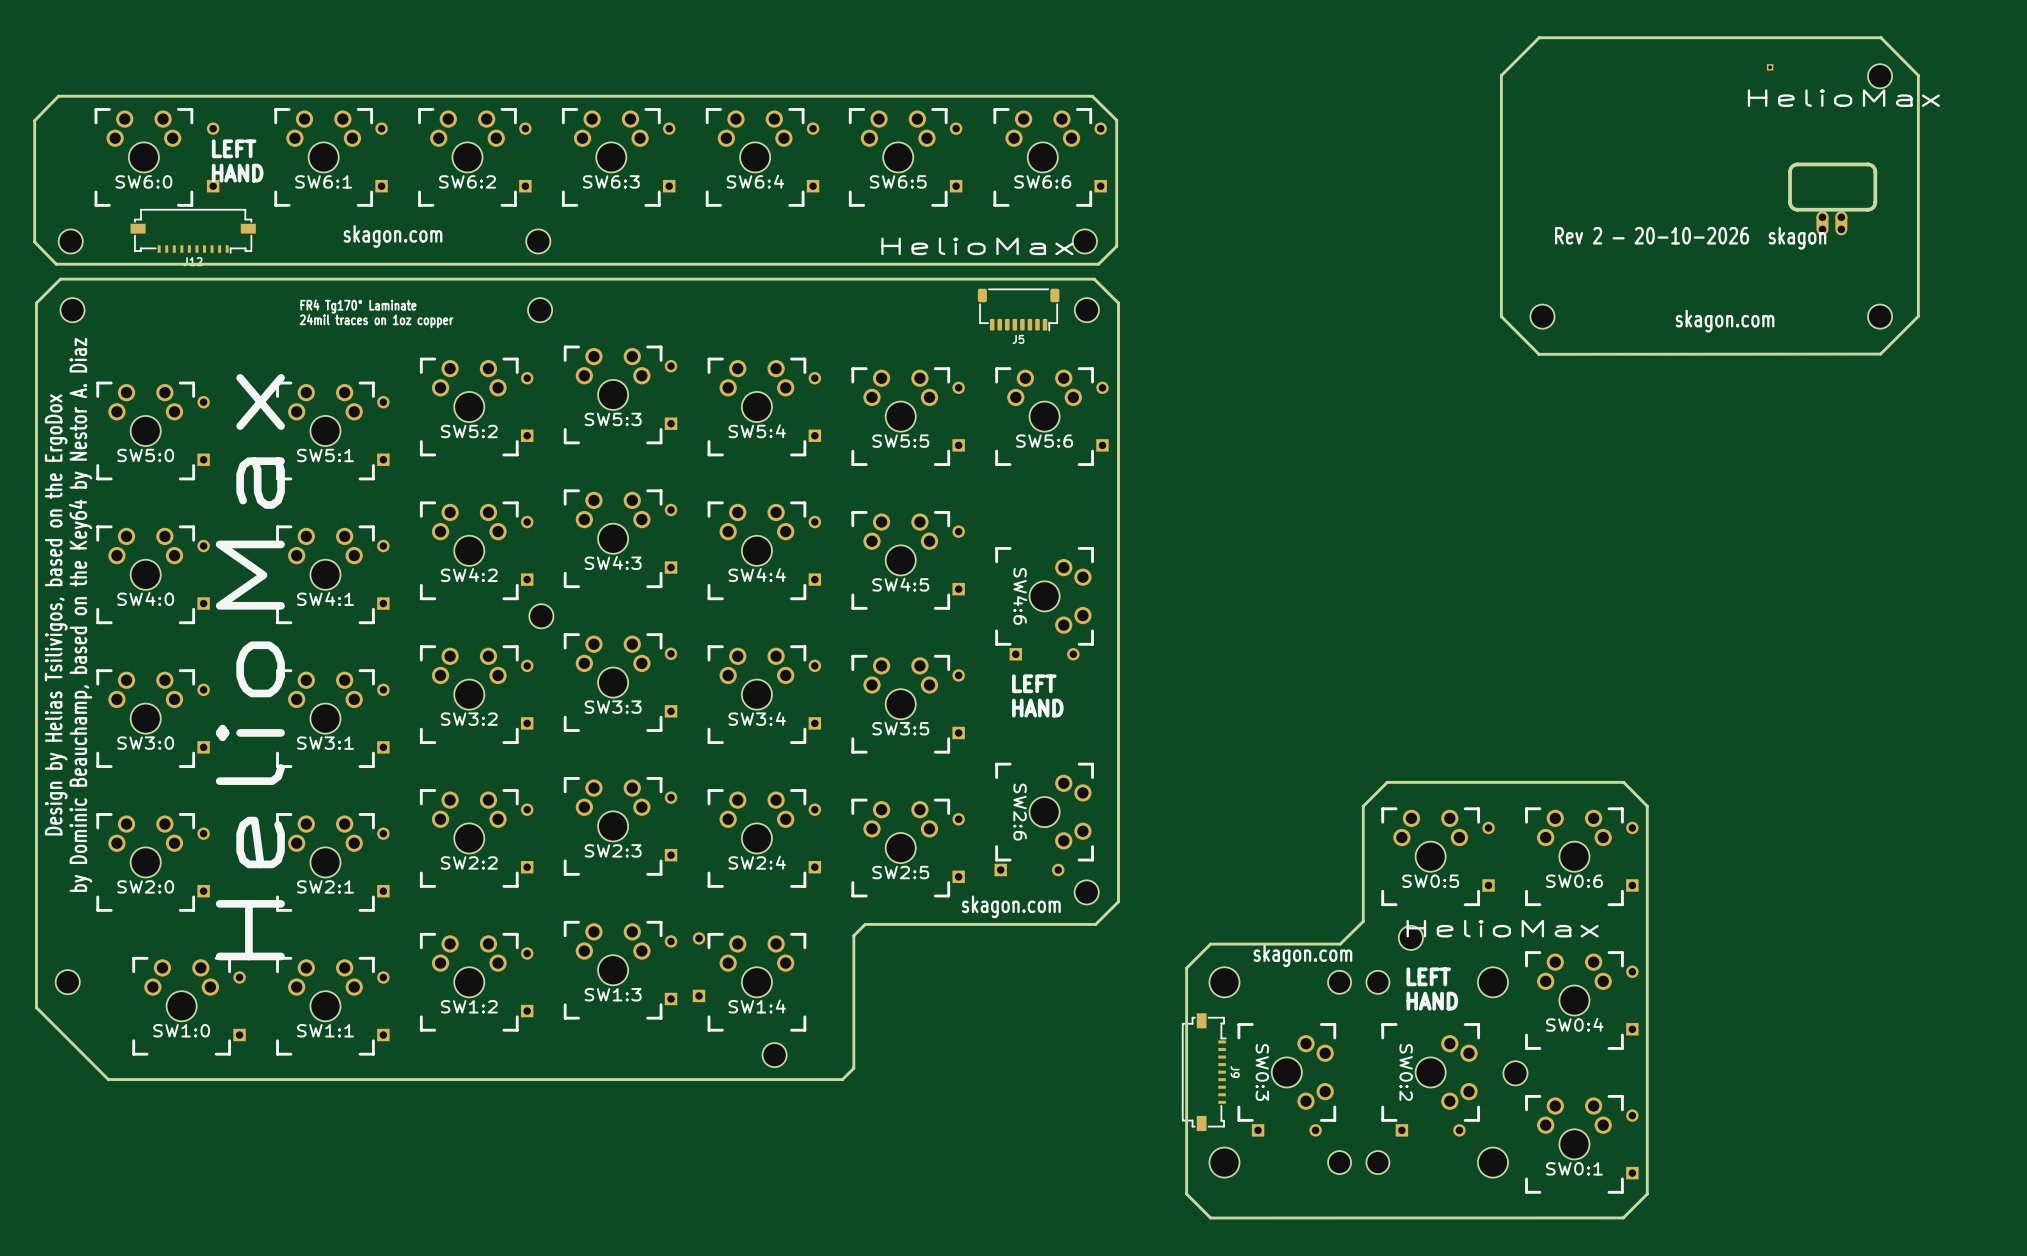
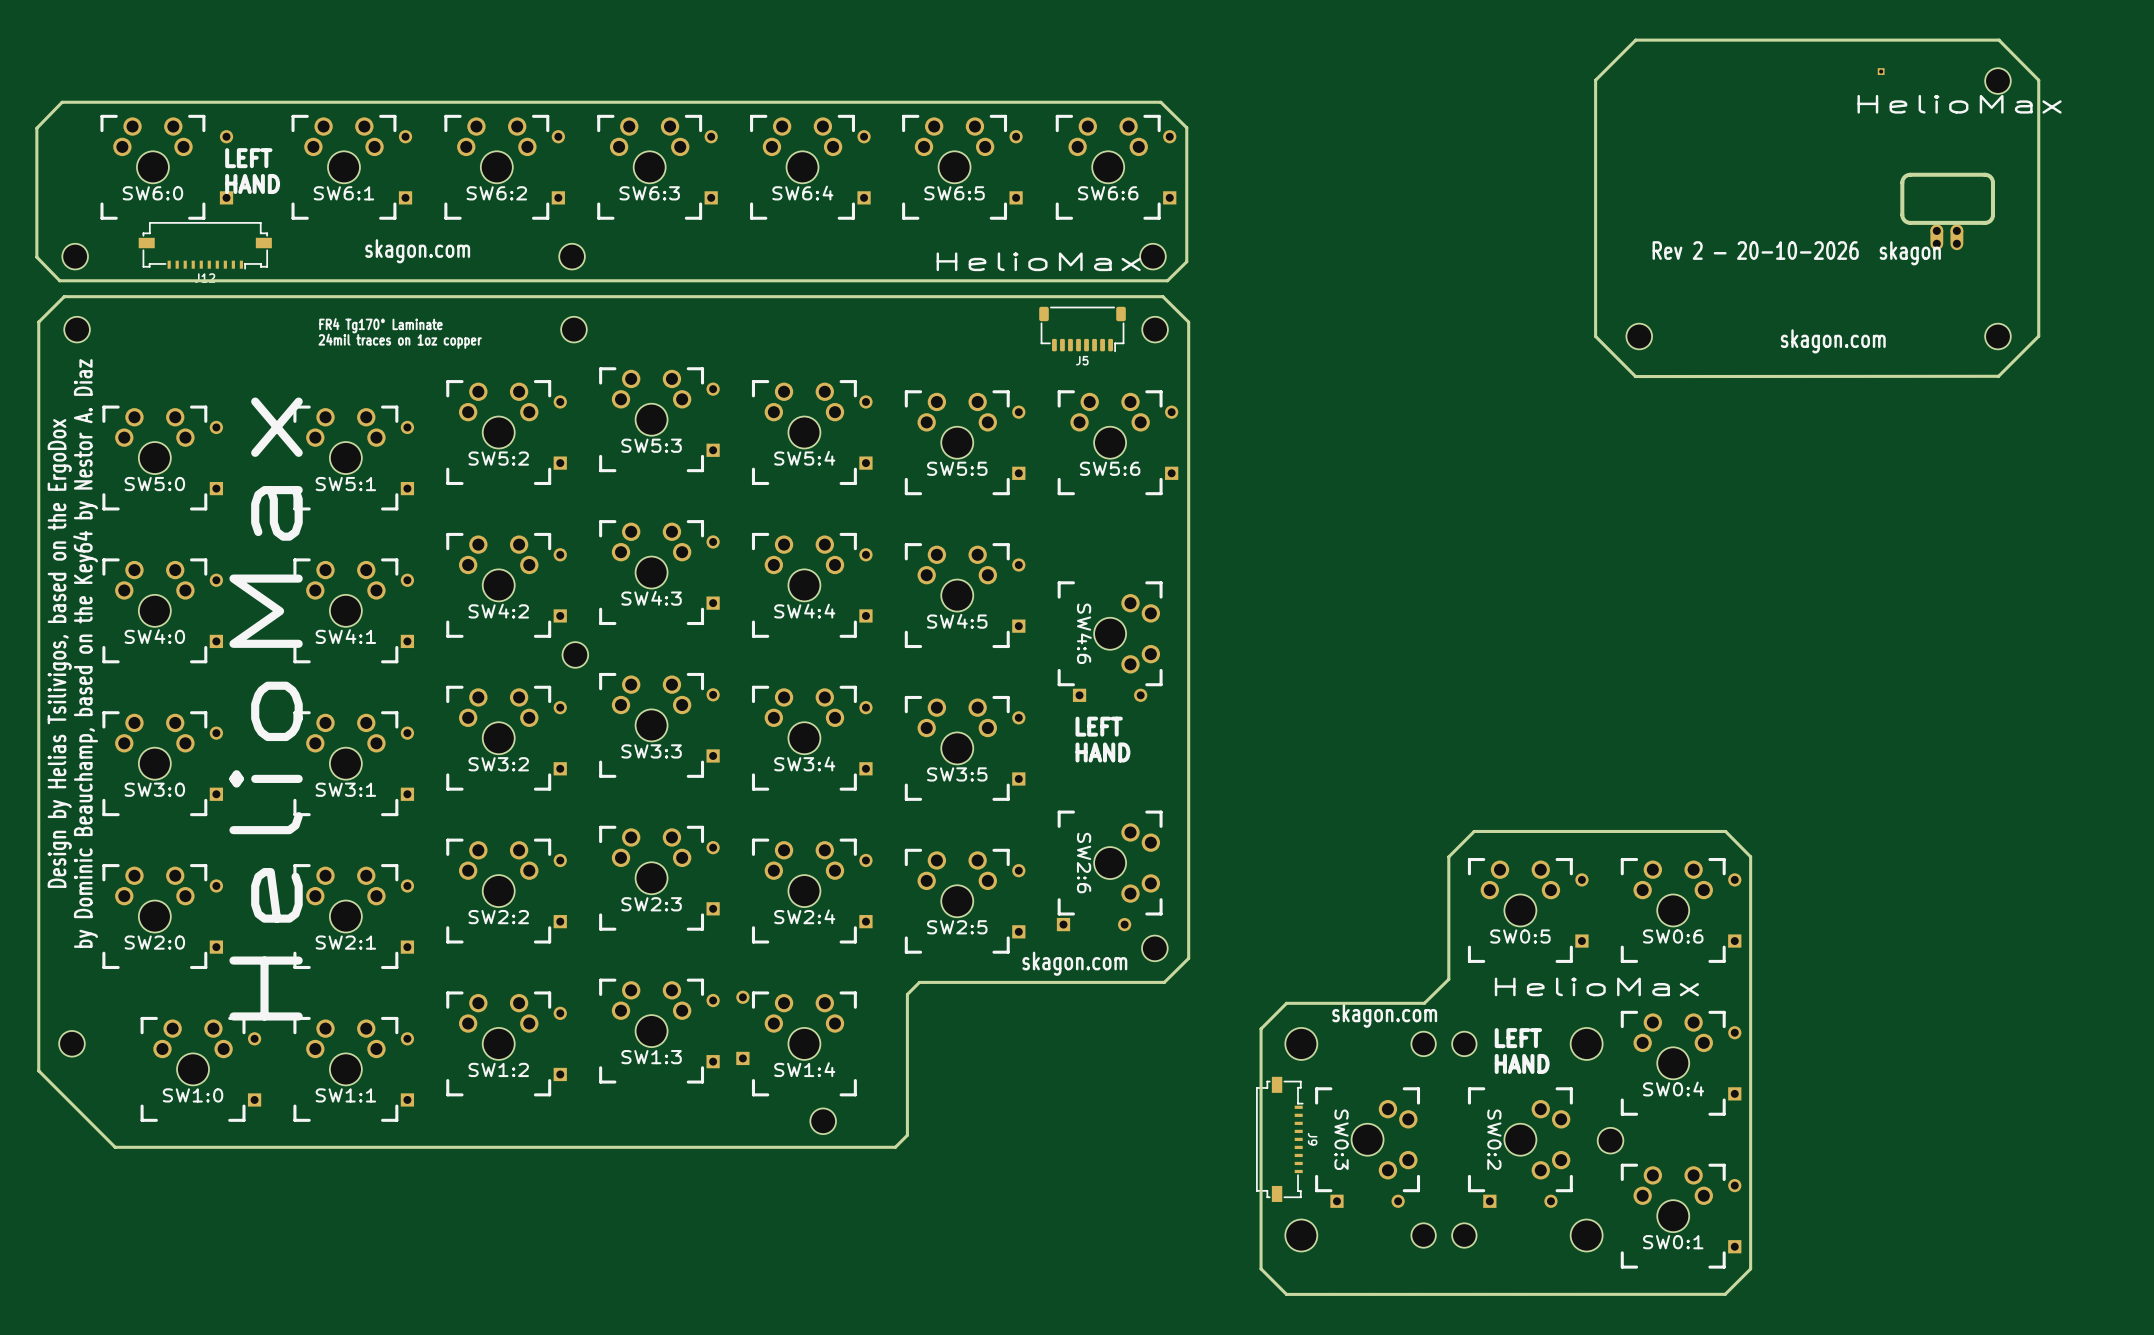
part: (1410, 937) -> none

